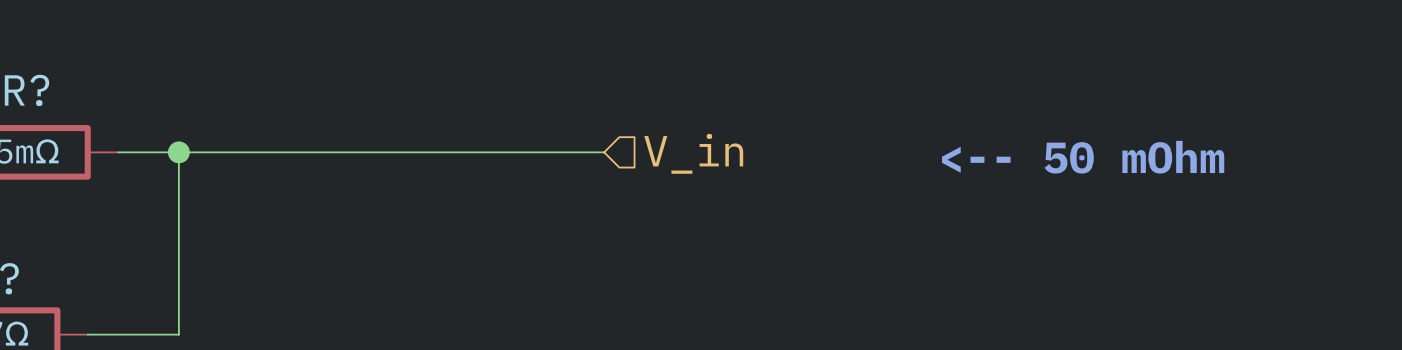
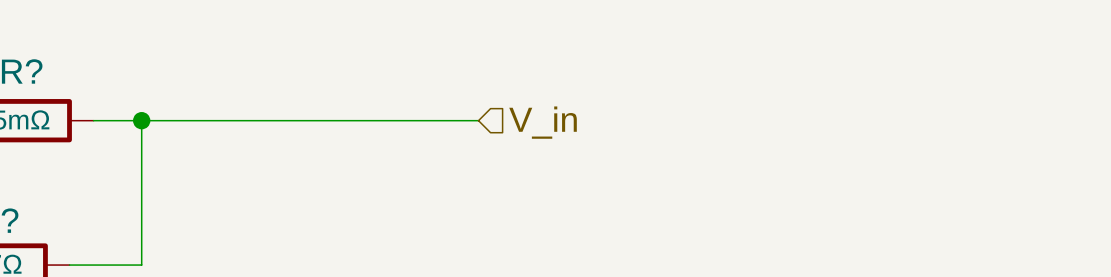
text: <-- 50 mOhm (1083, 157) -> none

